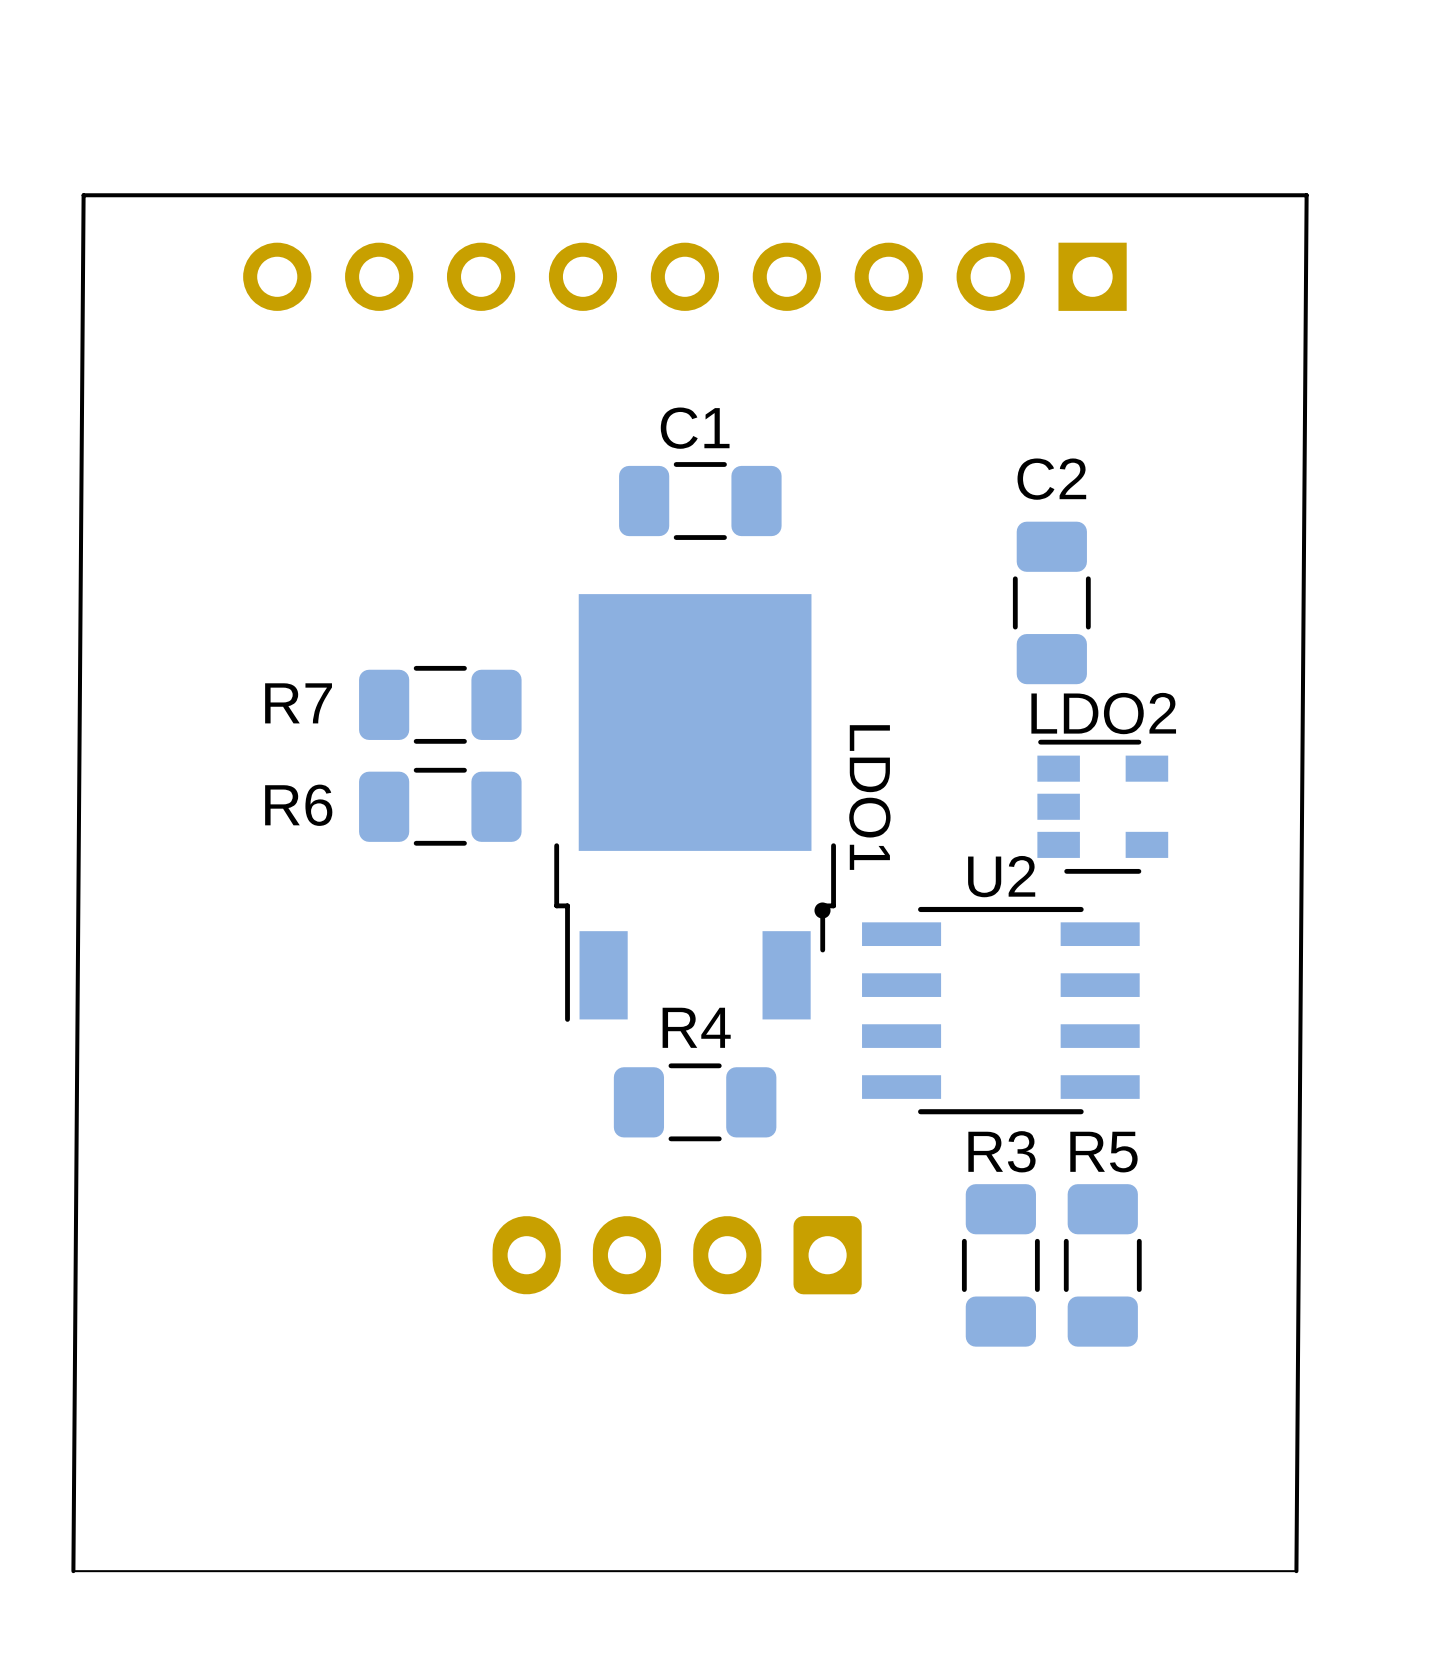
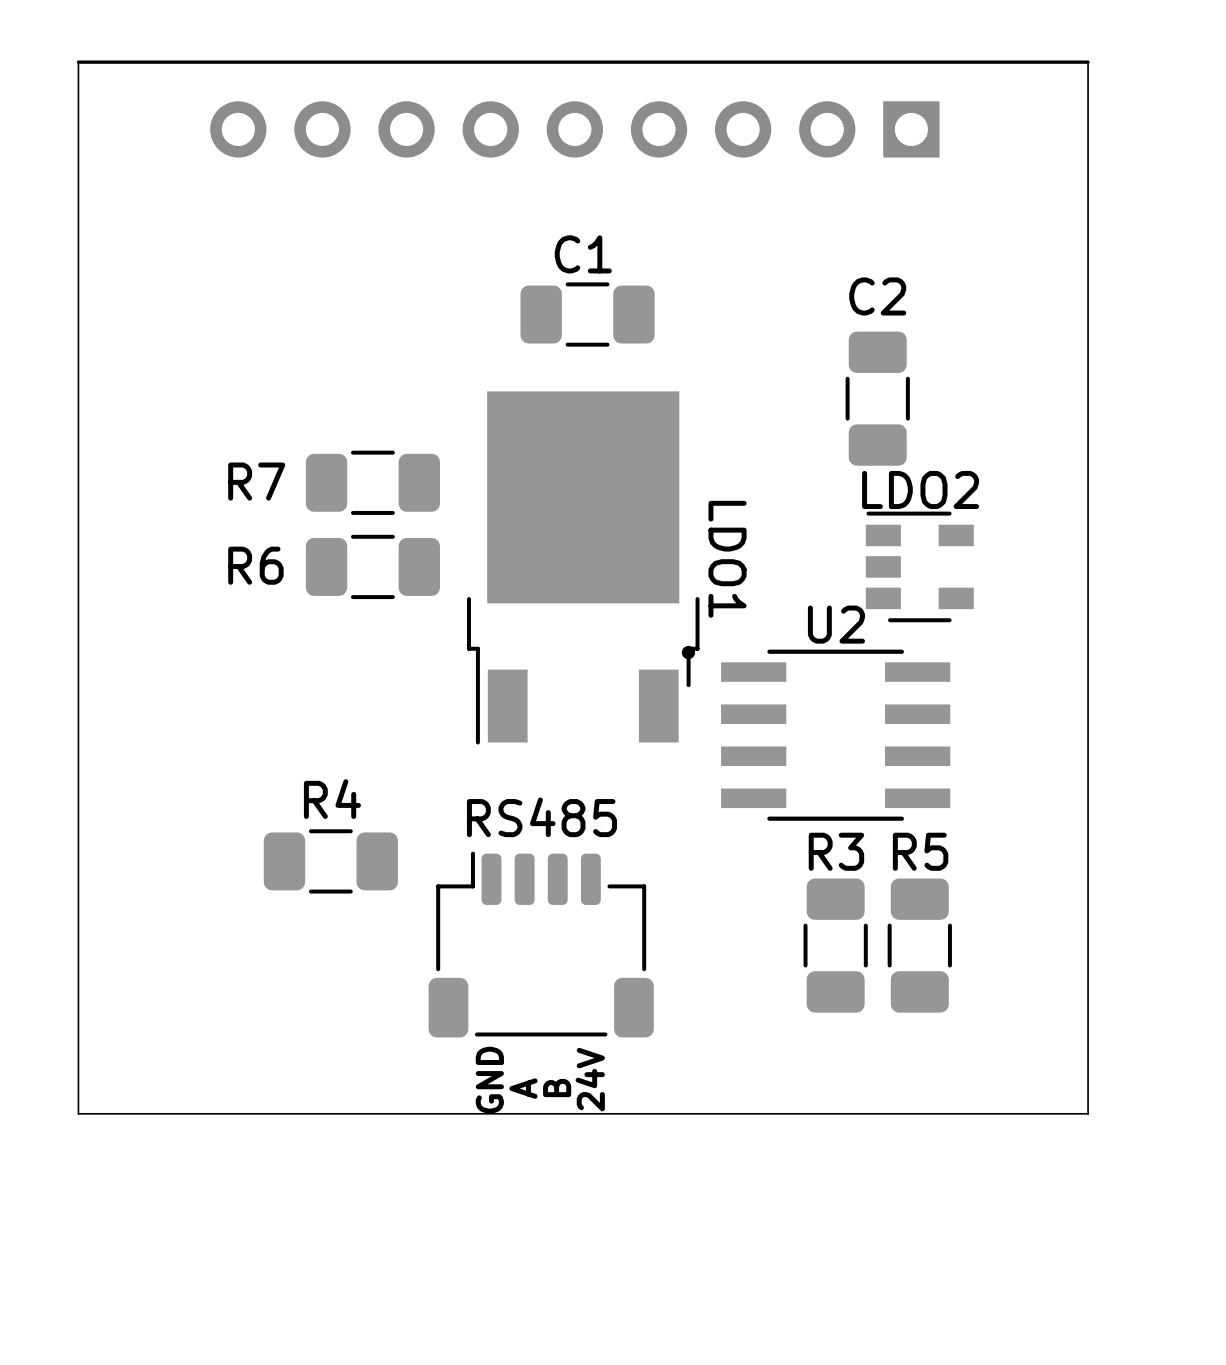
board edge: (1306, 195) (1296, 1571) (73, 1571) (83, 195) -> (1088, 62) (1088, 1113) (78, 1113) (78, 62)
R4 position: (695, 1102) -> (330, 861)
part: (677, 1255) -> none
RS485: none -> (541, 944)
text: none -> 24V (590, 1079)
text: none -> GND (489, 1080)
text: none -> A (523, 1088)
text: none -> B (557, 1088)

